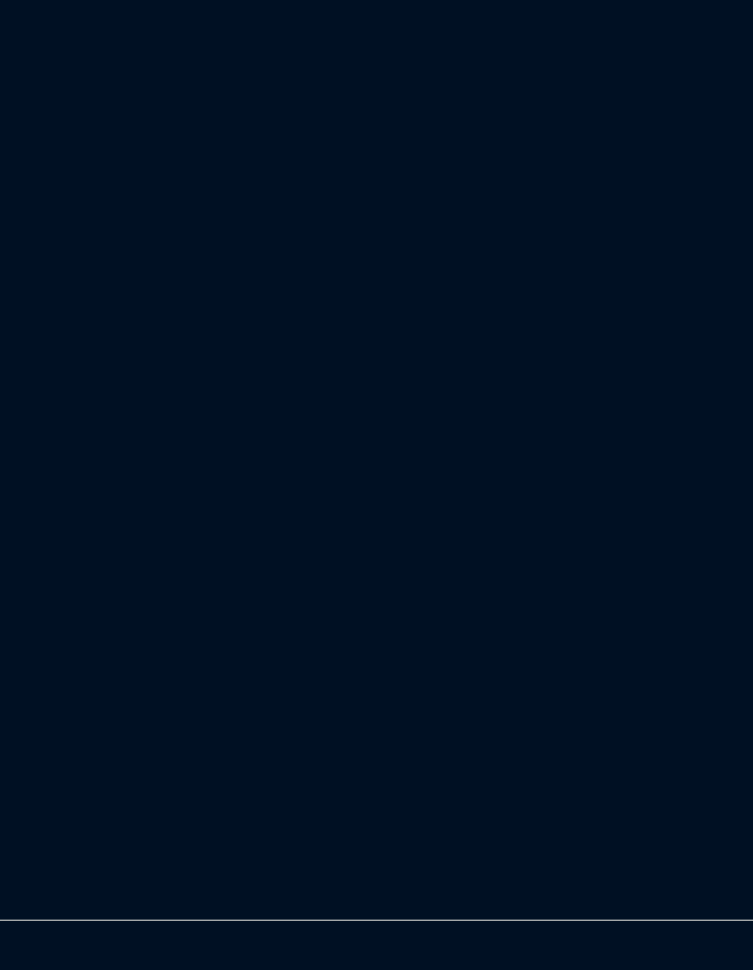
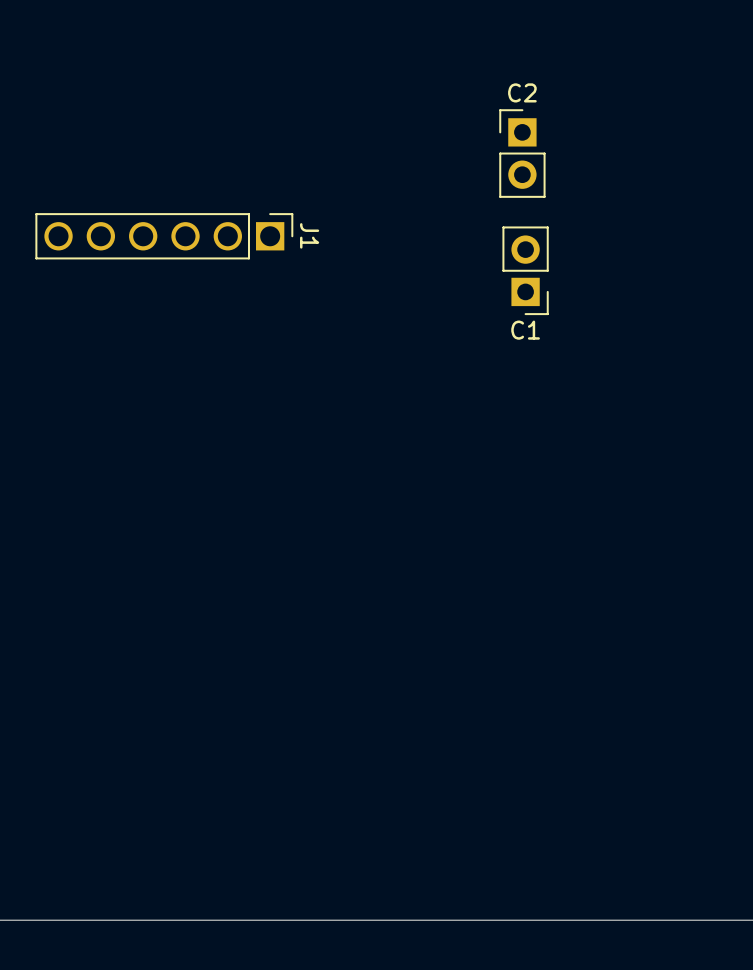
C2: none -> (522, 153)
J1: none -> (164, 236)
C1: none -> (525, 270)

